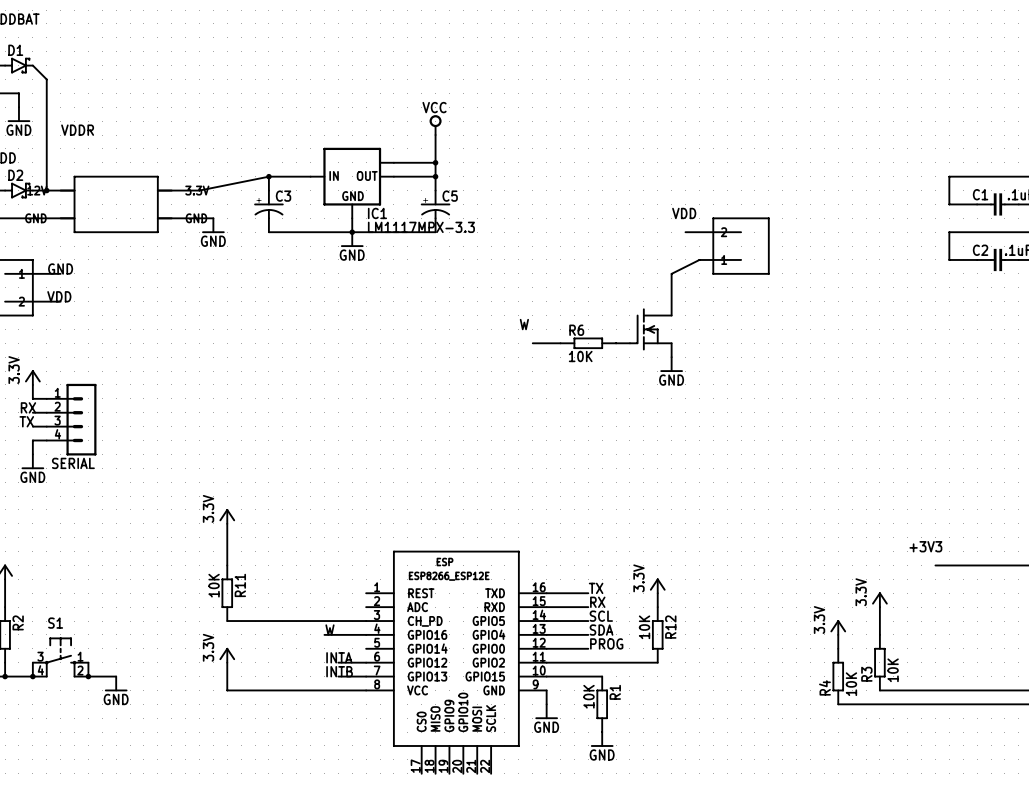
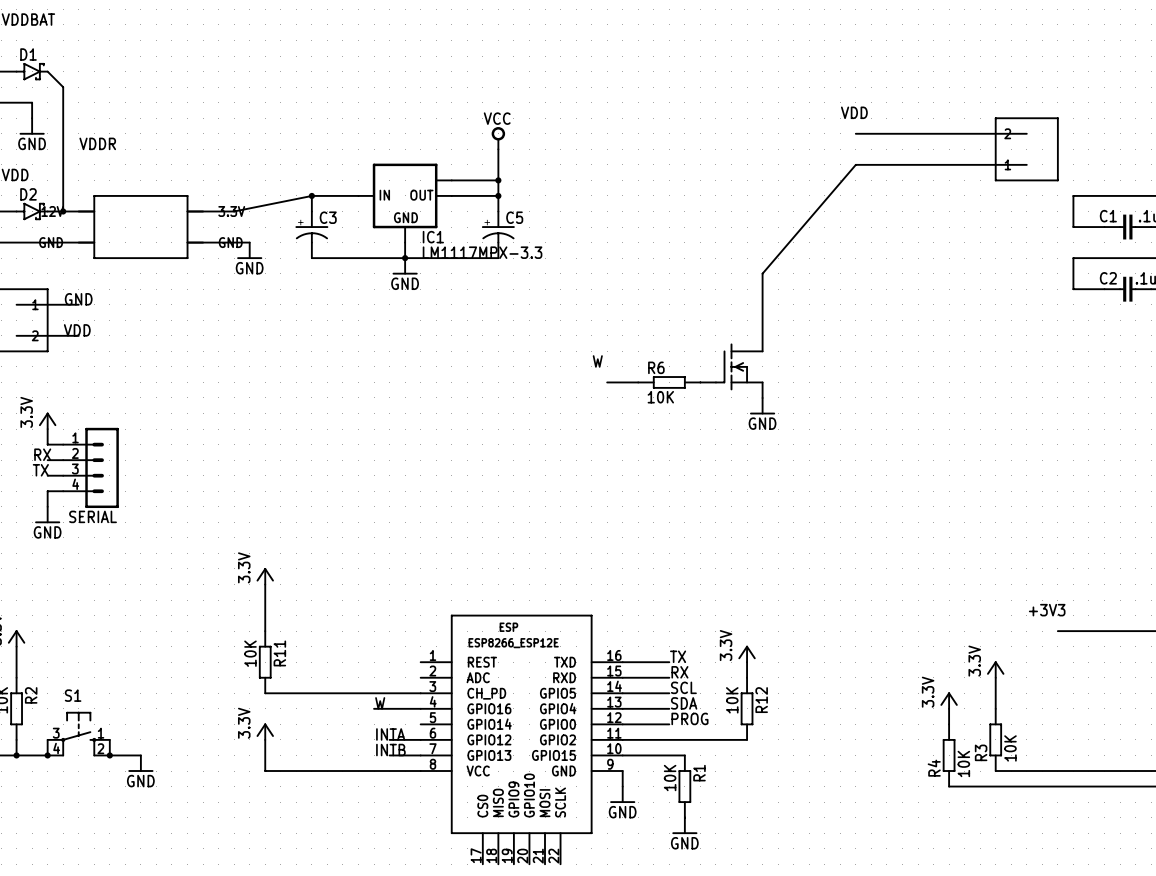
wire: none -> (855, 133) (1026, 133)
part: none -> (1026, 149)
label position: VDD (684, 213) -> VDD (854, 112)
wire: (685, 232) (741, 232) -> none
part: (741, 246) -> none
wire: (741, 259) (699, 259) (671, 273) -> (1026, 164) (855, 164) (762, 273) (762, 304)

